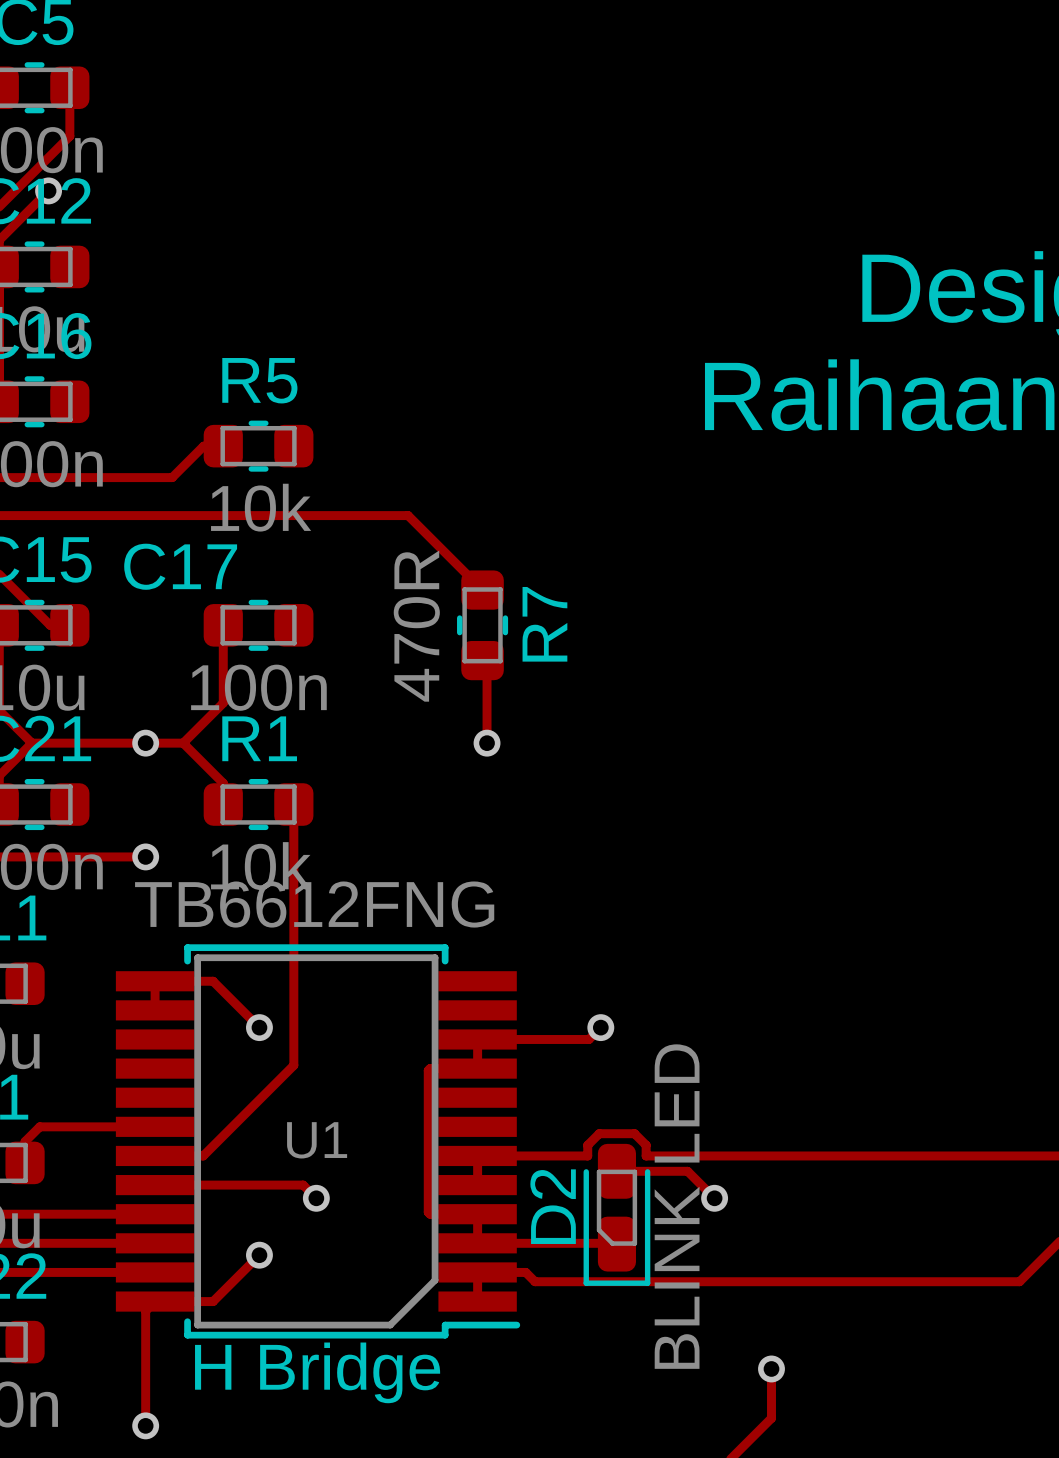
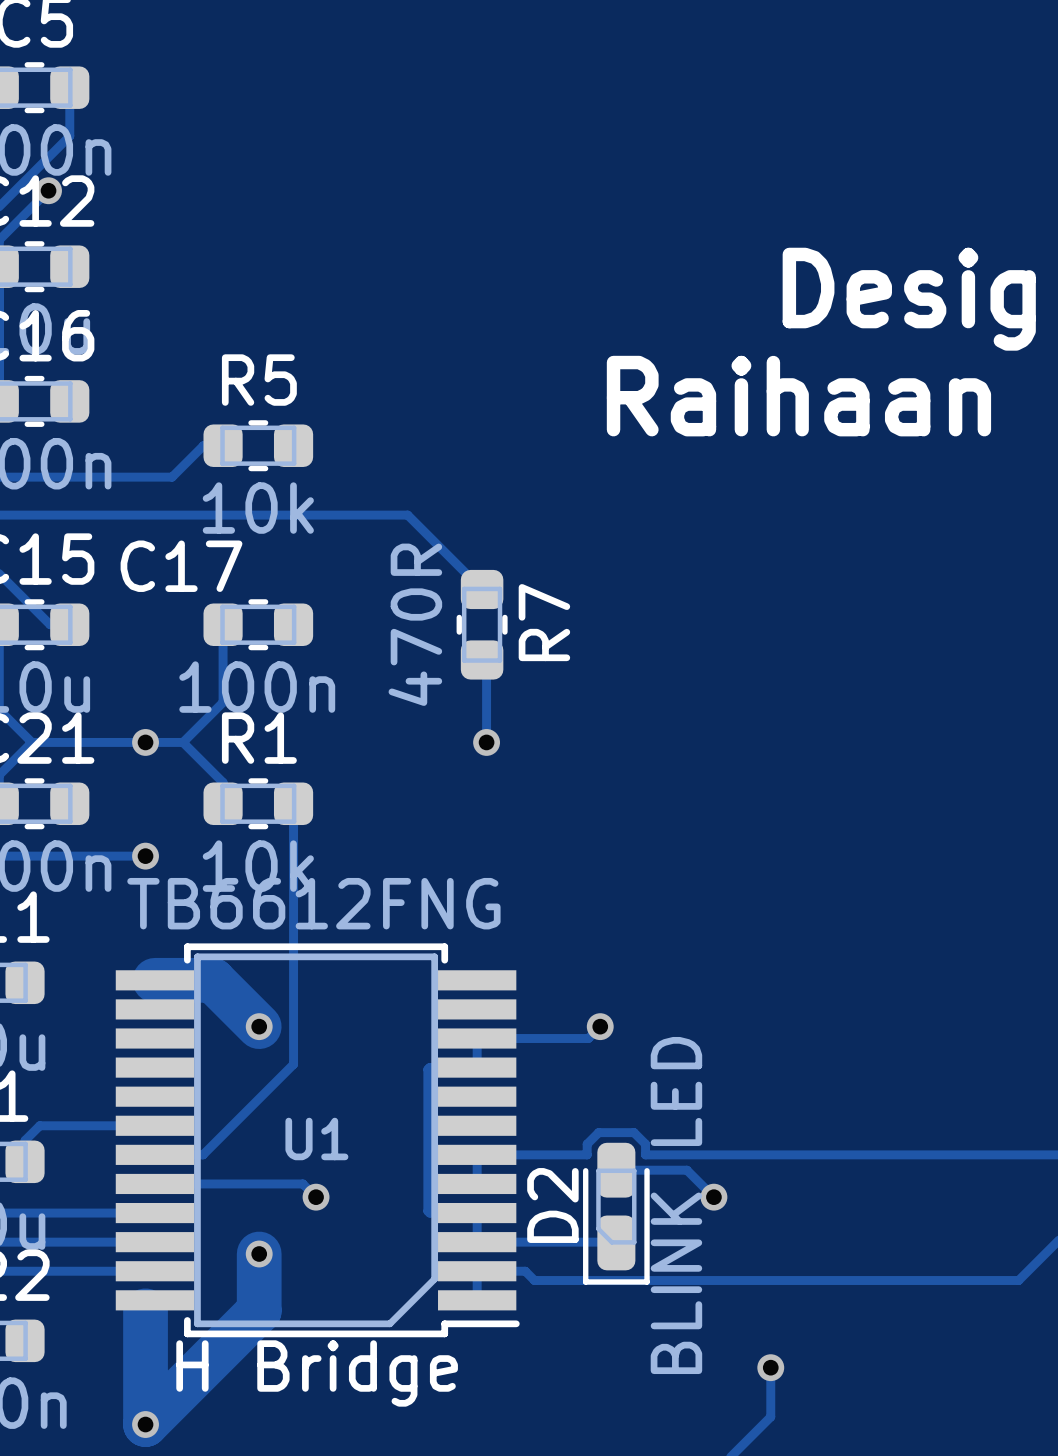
track width: thin (155, 981) (213, 981) (259, 1027) -> thick (154, 980) (212, 980) (259, 1026)
track: (259, 1255) (213, 1301) (155, 1301) -> (259, 1254) (259, 1310) (145, 1424)
track width: thin (145, 1312) (145, 1425) -> thick (145, 1310) (145, 1424)

